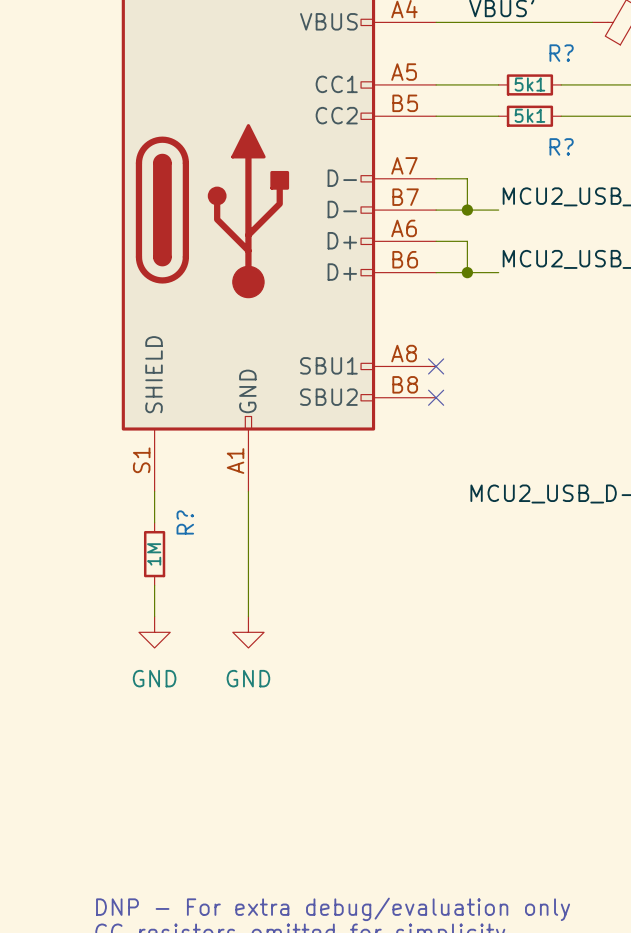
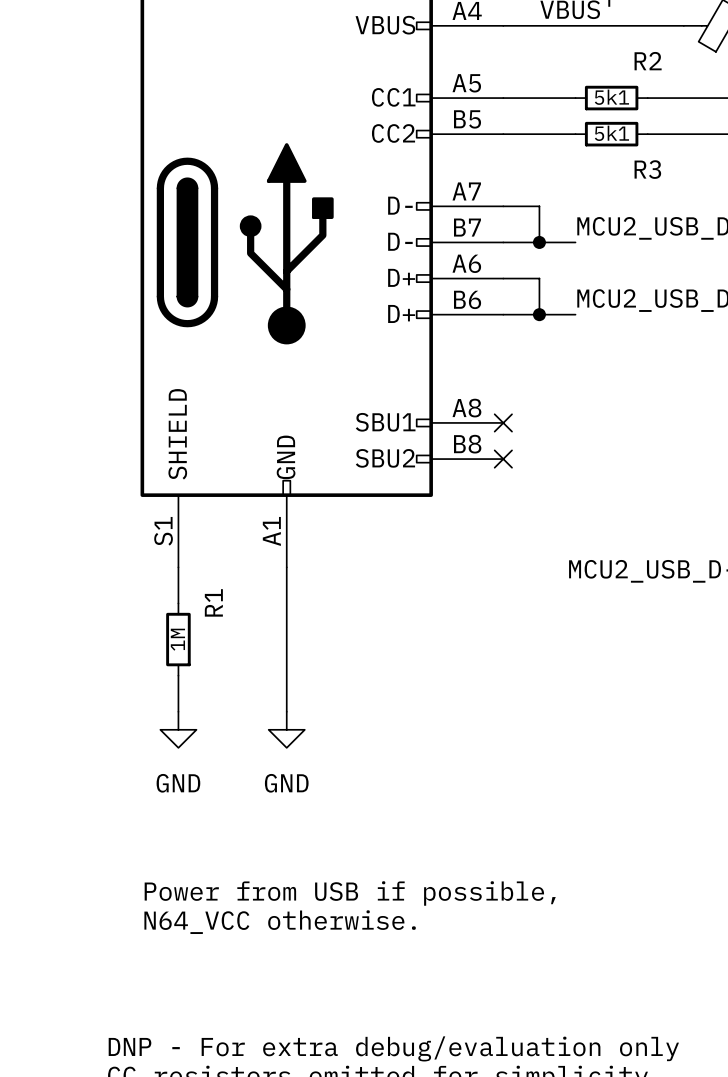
R? name: R? (561, 53) -> R2 (648, 61)
R? name: R? (561, 146) -> R3 (647, 169)
R? name: R? (185, 522) -> R1 (213, 602)
text: none -> Power from USB if possible, (350, 893)
text: none -> N64_VCC otherwise. (280, 922)

